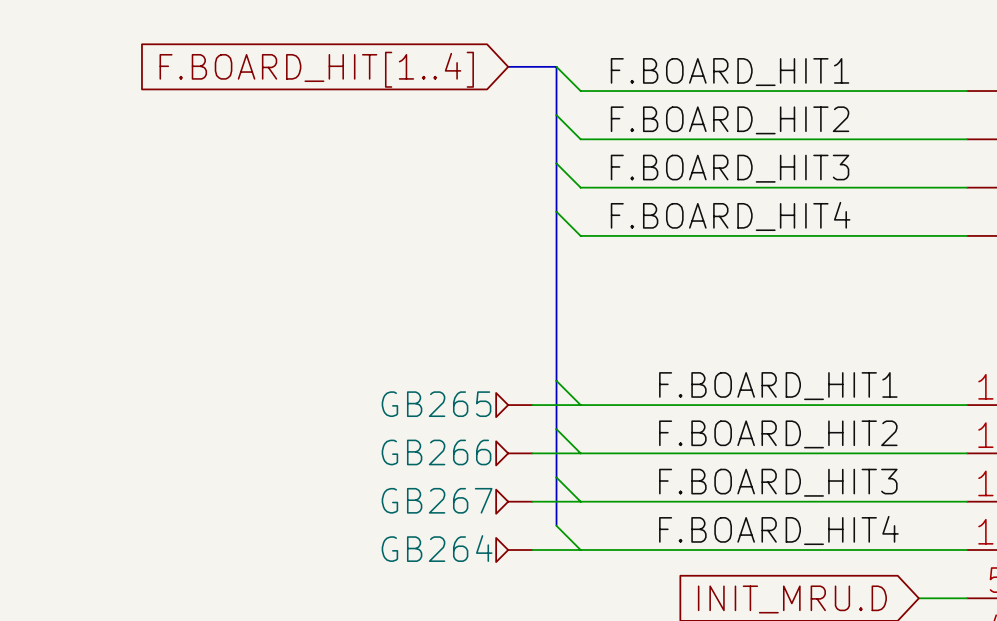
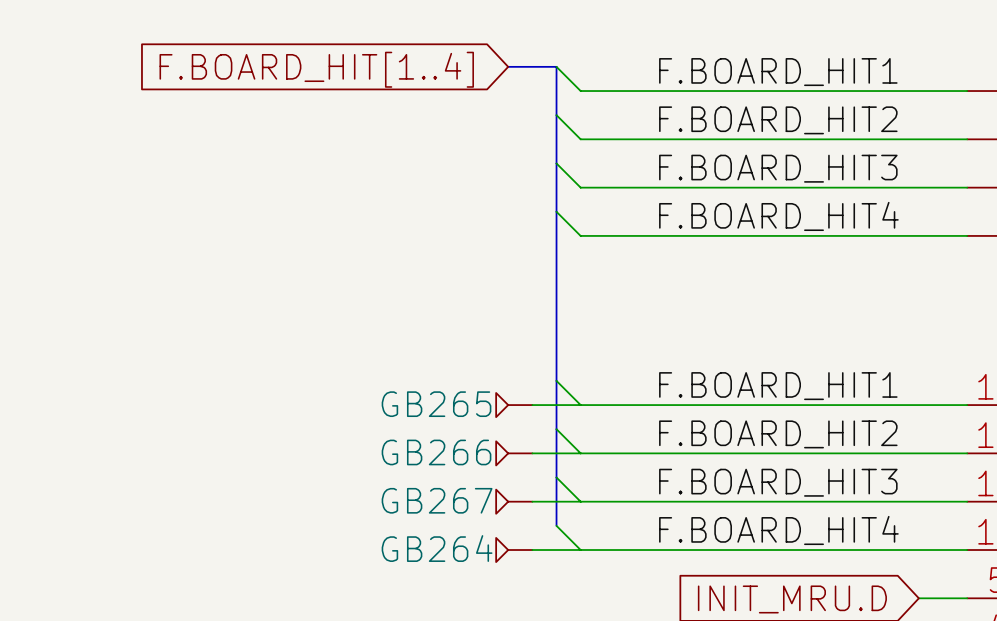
label position: F.BOARD_HIT1 (730, 72) -> F.BOARD_HIT1 (778, 72)
label position: F.BOARD_HIT2 (730, 120) -> F.BOARD_HIT2 (778, 120)
label position: F.BOARD_HIT3 (730, 168) -> F.BOARD_HIT3 (778, 168)
label position: F.BOARD_HIT4 (730, 216) -> F.BOARD_HIT4 (778, 216)

